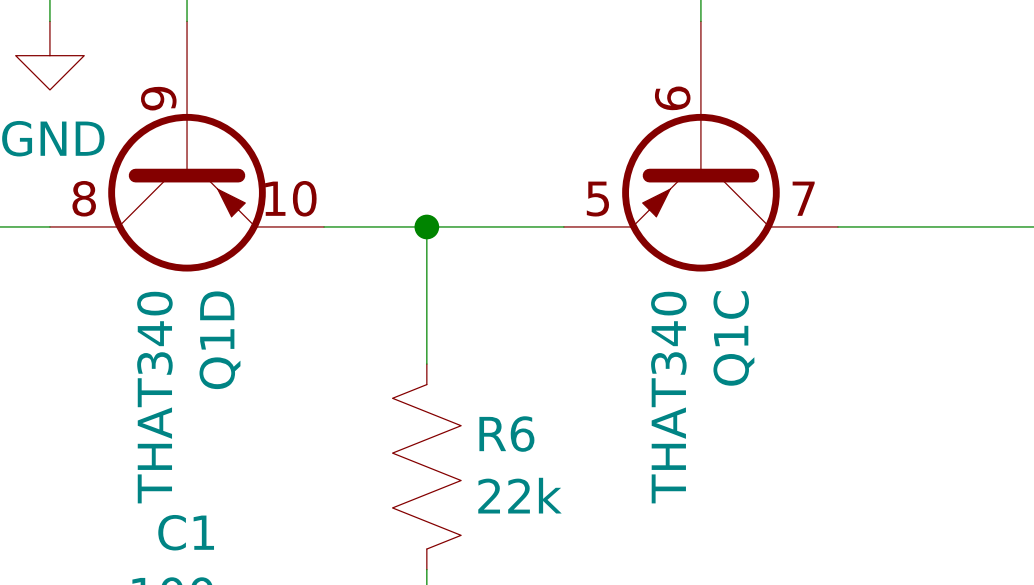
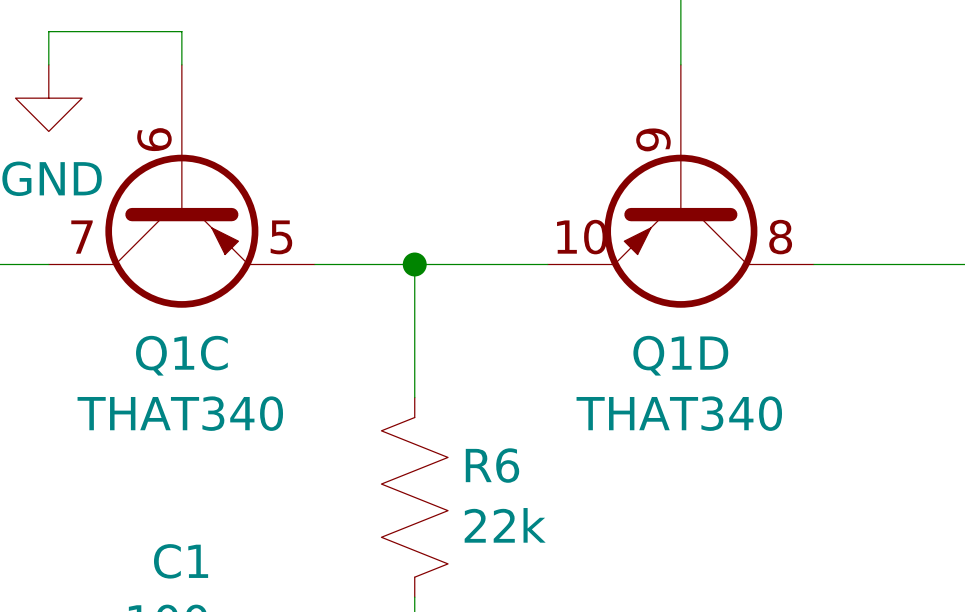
Q1D position: (187, 146) -> (680, 186)
Q1C position: (700, 146) -> (181, 186)
Q1D flip: as is (187, 192) -> left-right (680, 231)
Q1C flip: as is (700, 192) -> left-right (181, 231)

